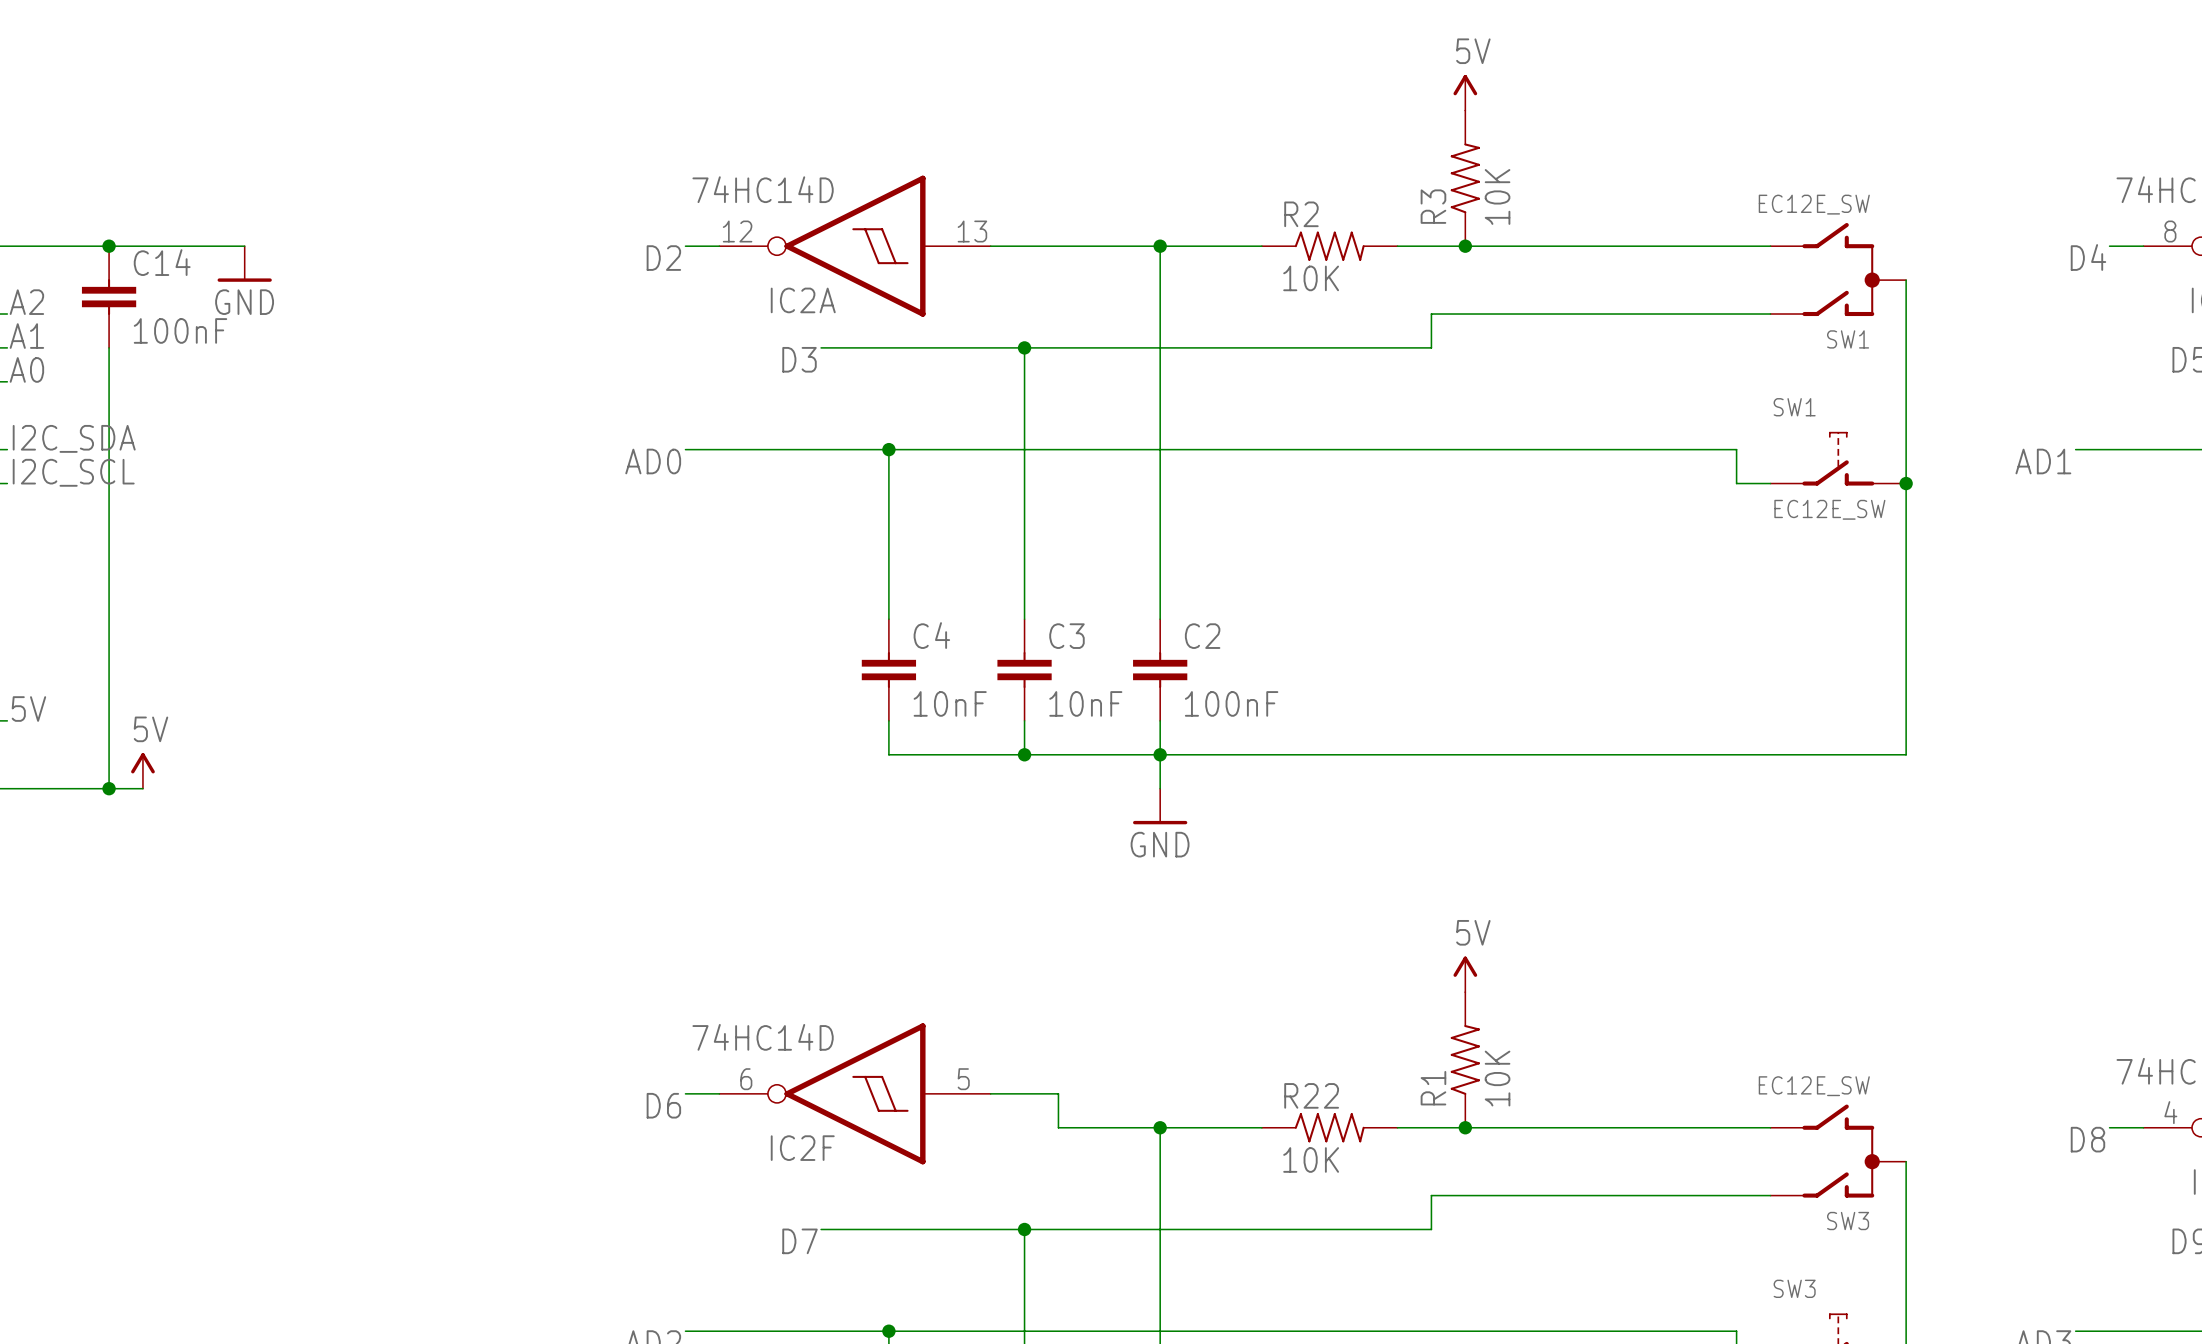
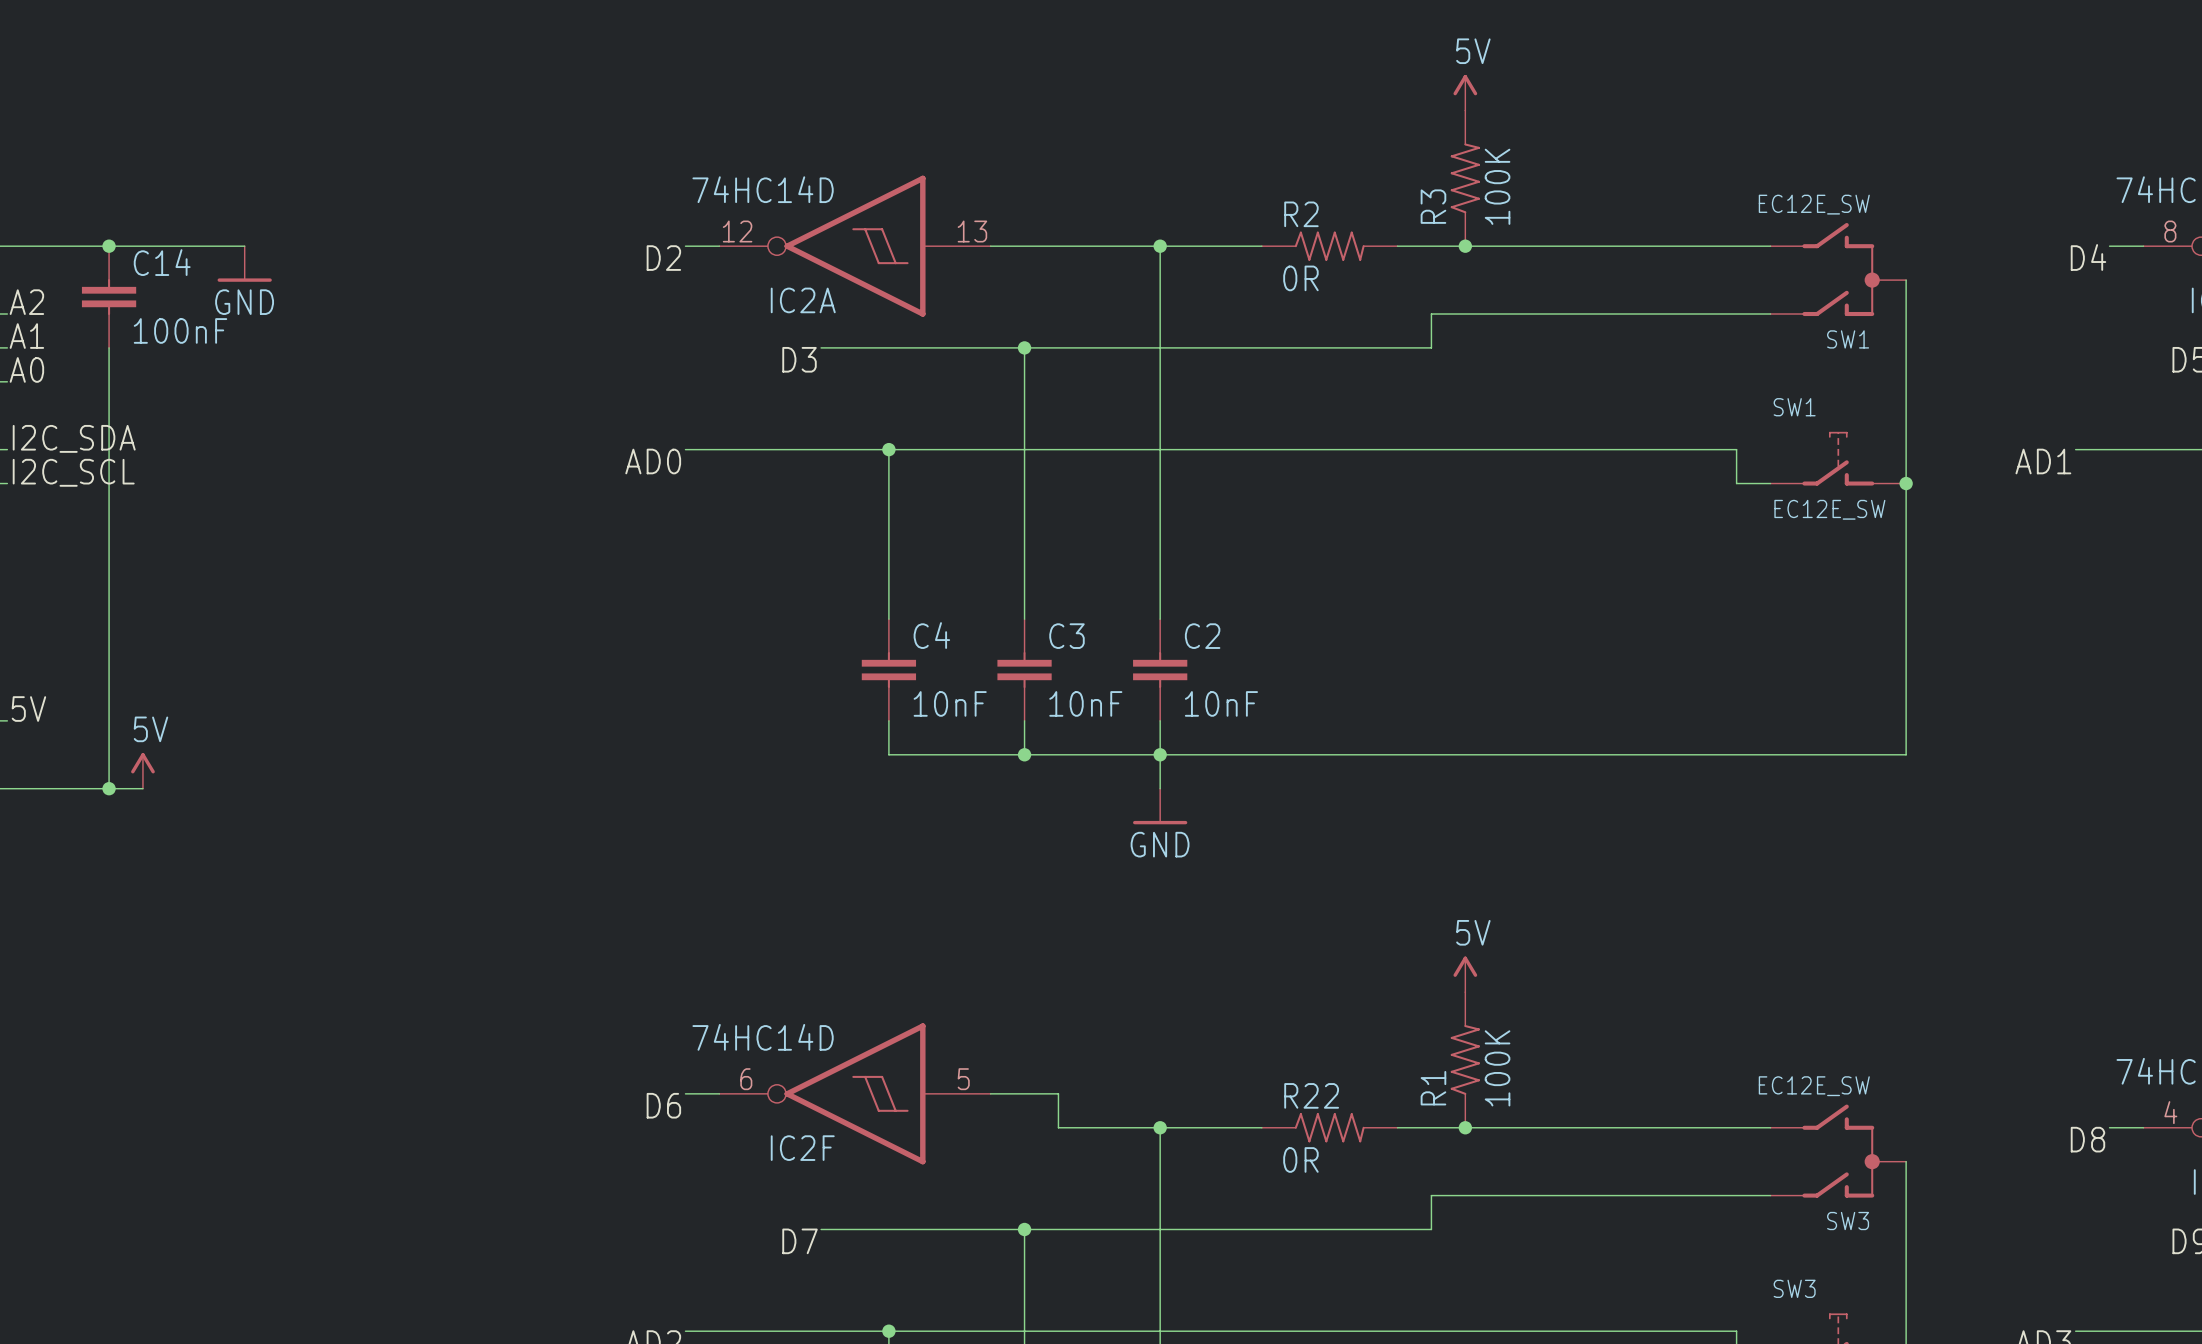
R3 value: 10K (1497, 196) -> 100K (1497, 186)
R2 value: 10K (1311, 278) -> 0R (1300, 278)
C2 value: 100nF (1231, 703) -> 10nF (1221, 703)
R1 value: 10K (1497, 1078) -> 100K (1497, 1068)
R22 value: 10K (1311, 1159) -> 0R (1300, 1159)

